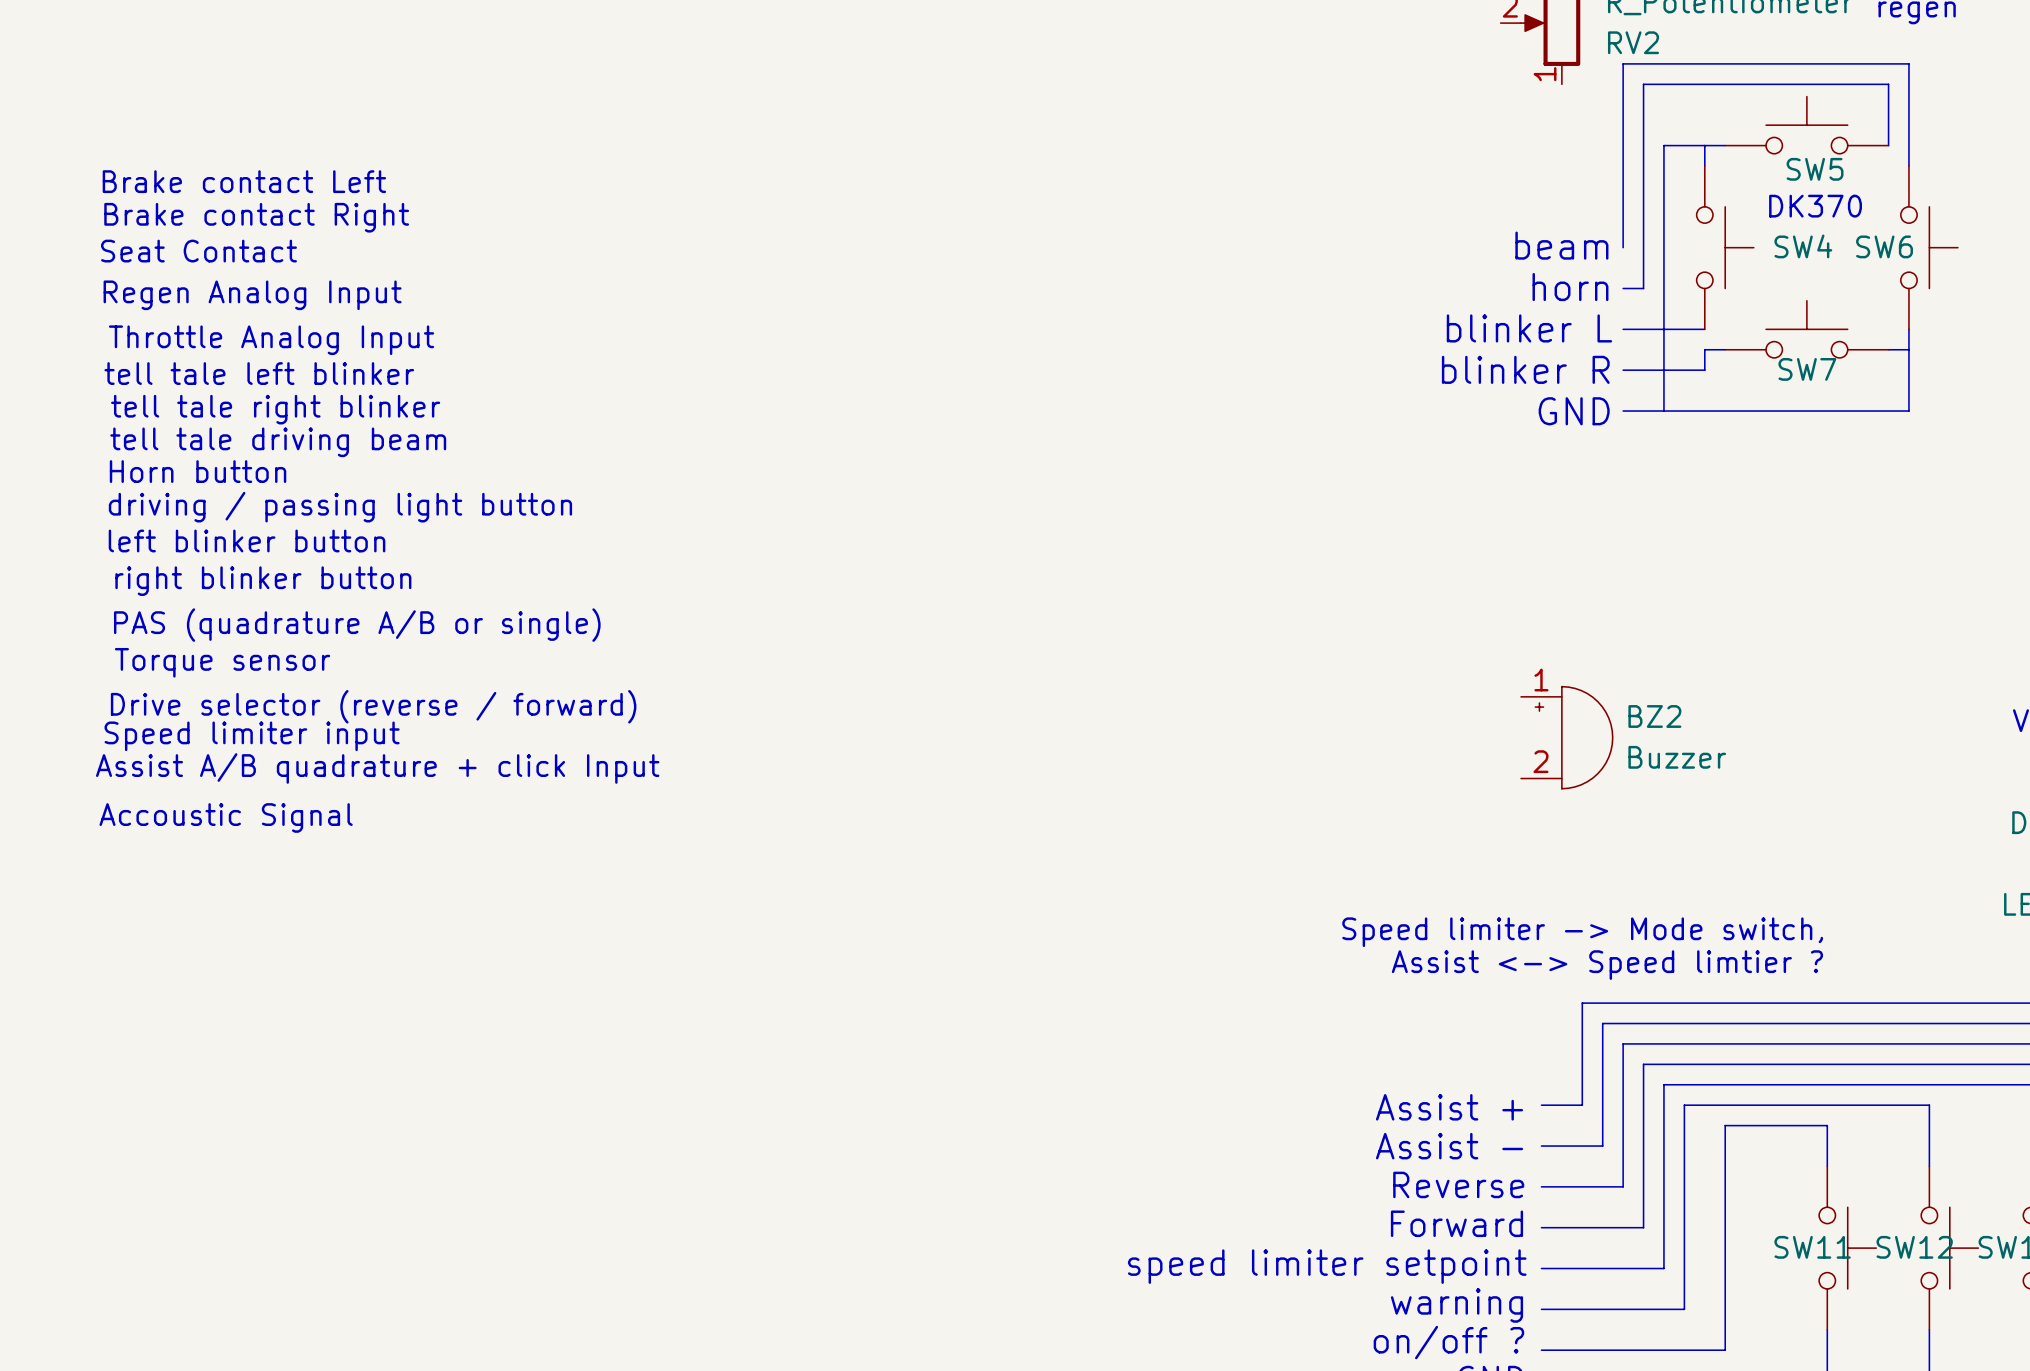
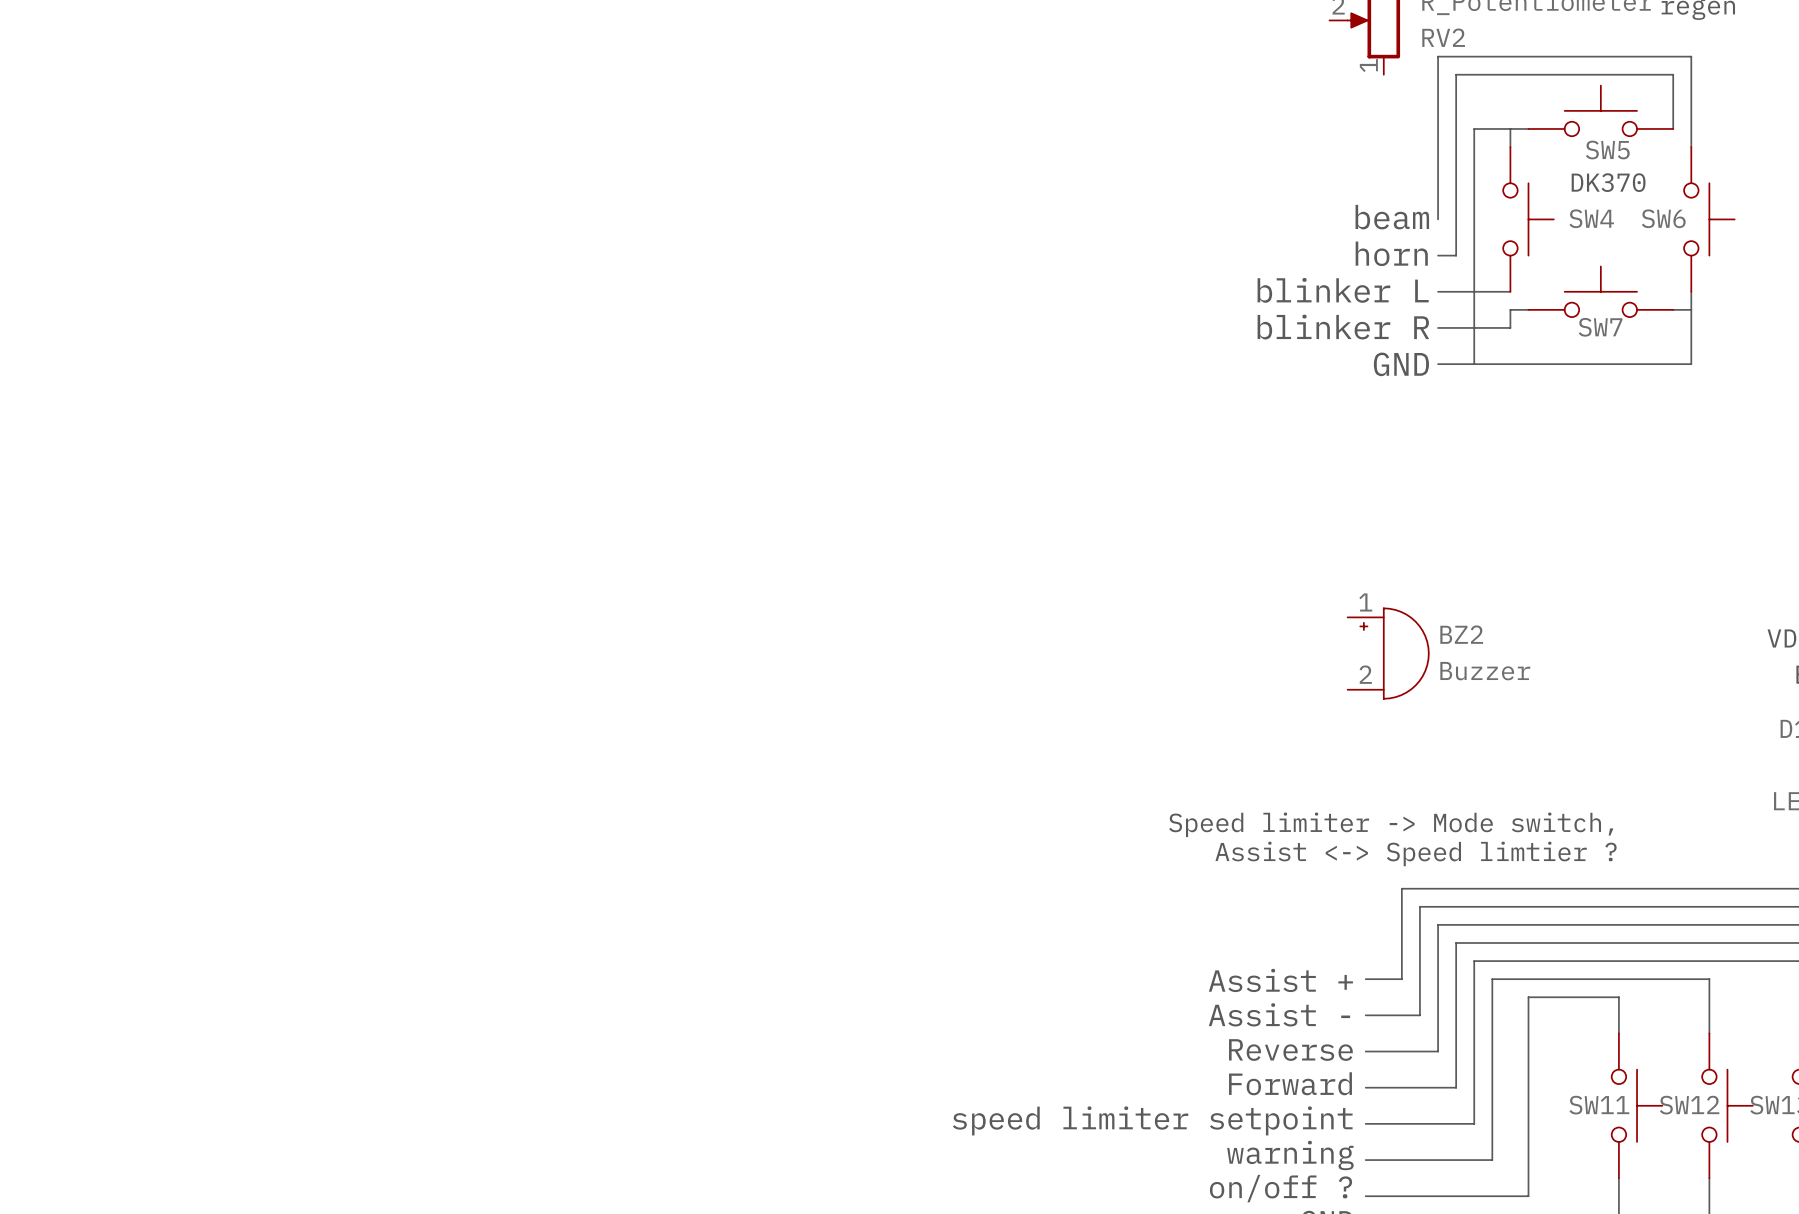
text: Brake contact Left (244, 181) -> none
text: Brake contact Right (256, 217) -> none
text: Seat Contact (198, 251) -> none
text: Regen Analog Input (252, 295) -> none
text: Throttle Analog Input (271, 340) -> none
text: tell tale left blinker (259, 373) -> none
text: tell tale right blinker (275, 409) -> none
text: tell tale driving beam (278, 442) -> none
text: Horn button (198, 471) -> none
text: driving / passing light button (340, 507) -> none
text: left blinker button (247, 540) -> none
text: right blinker button (263, 581) -> none
text: PAS (quadrature A/B or single) (357, 625) -> none
text: Torque sensor (222, 662) -> none
text: Drive selector (reverse / forward) (373, 706) -> none
text: Speed limiter input (252, 736) -> none
text: Assist A/B quadrature + click Input (377, 768) -> none
text: Accoustic Signal (226, 817) -> none

